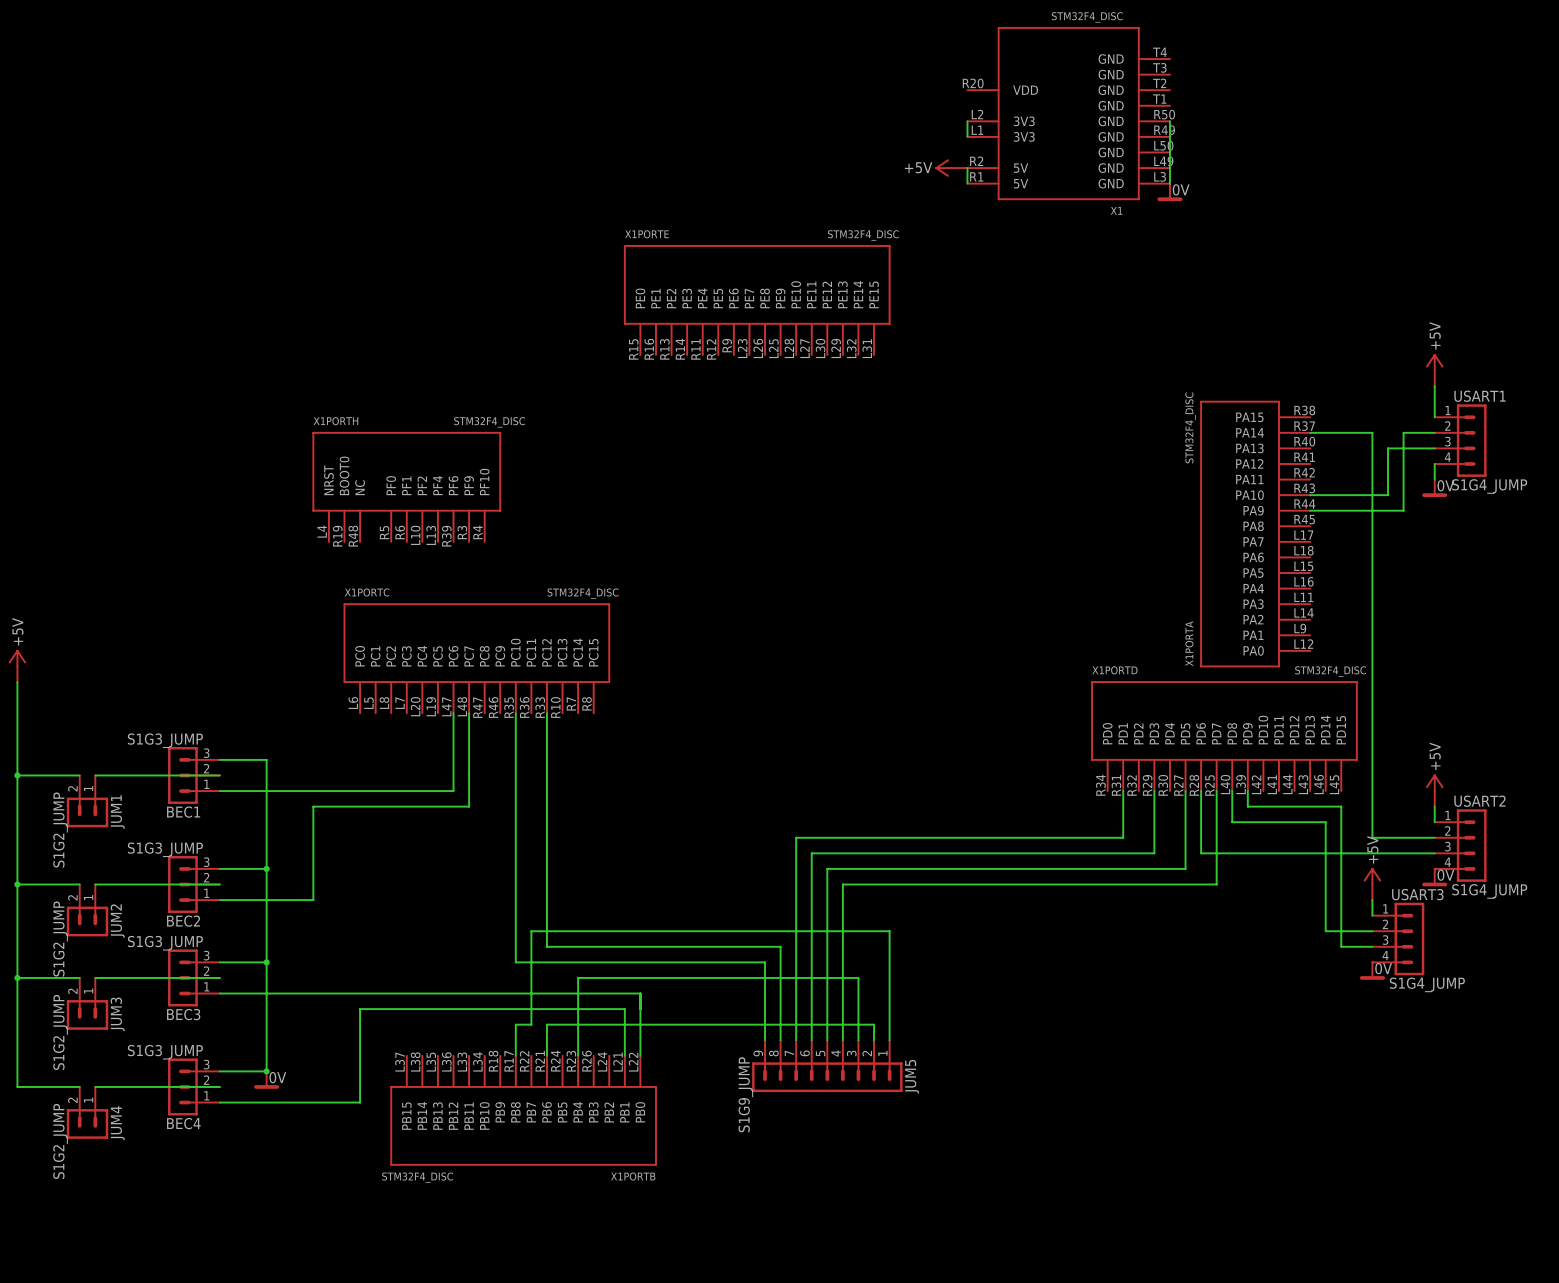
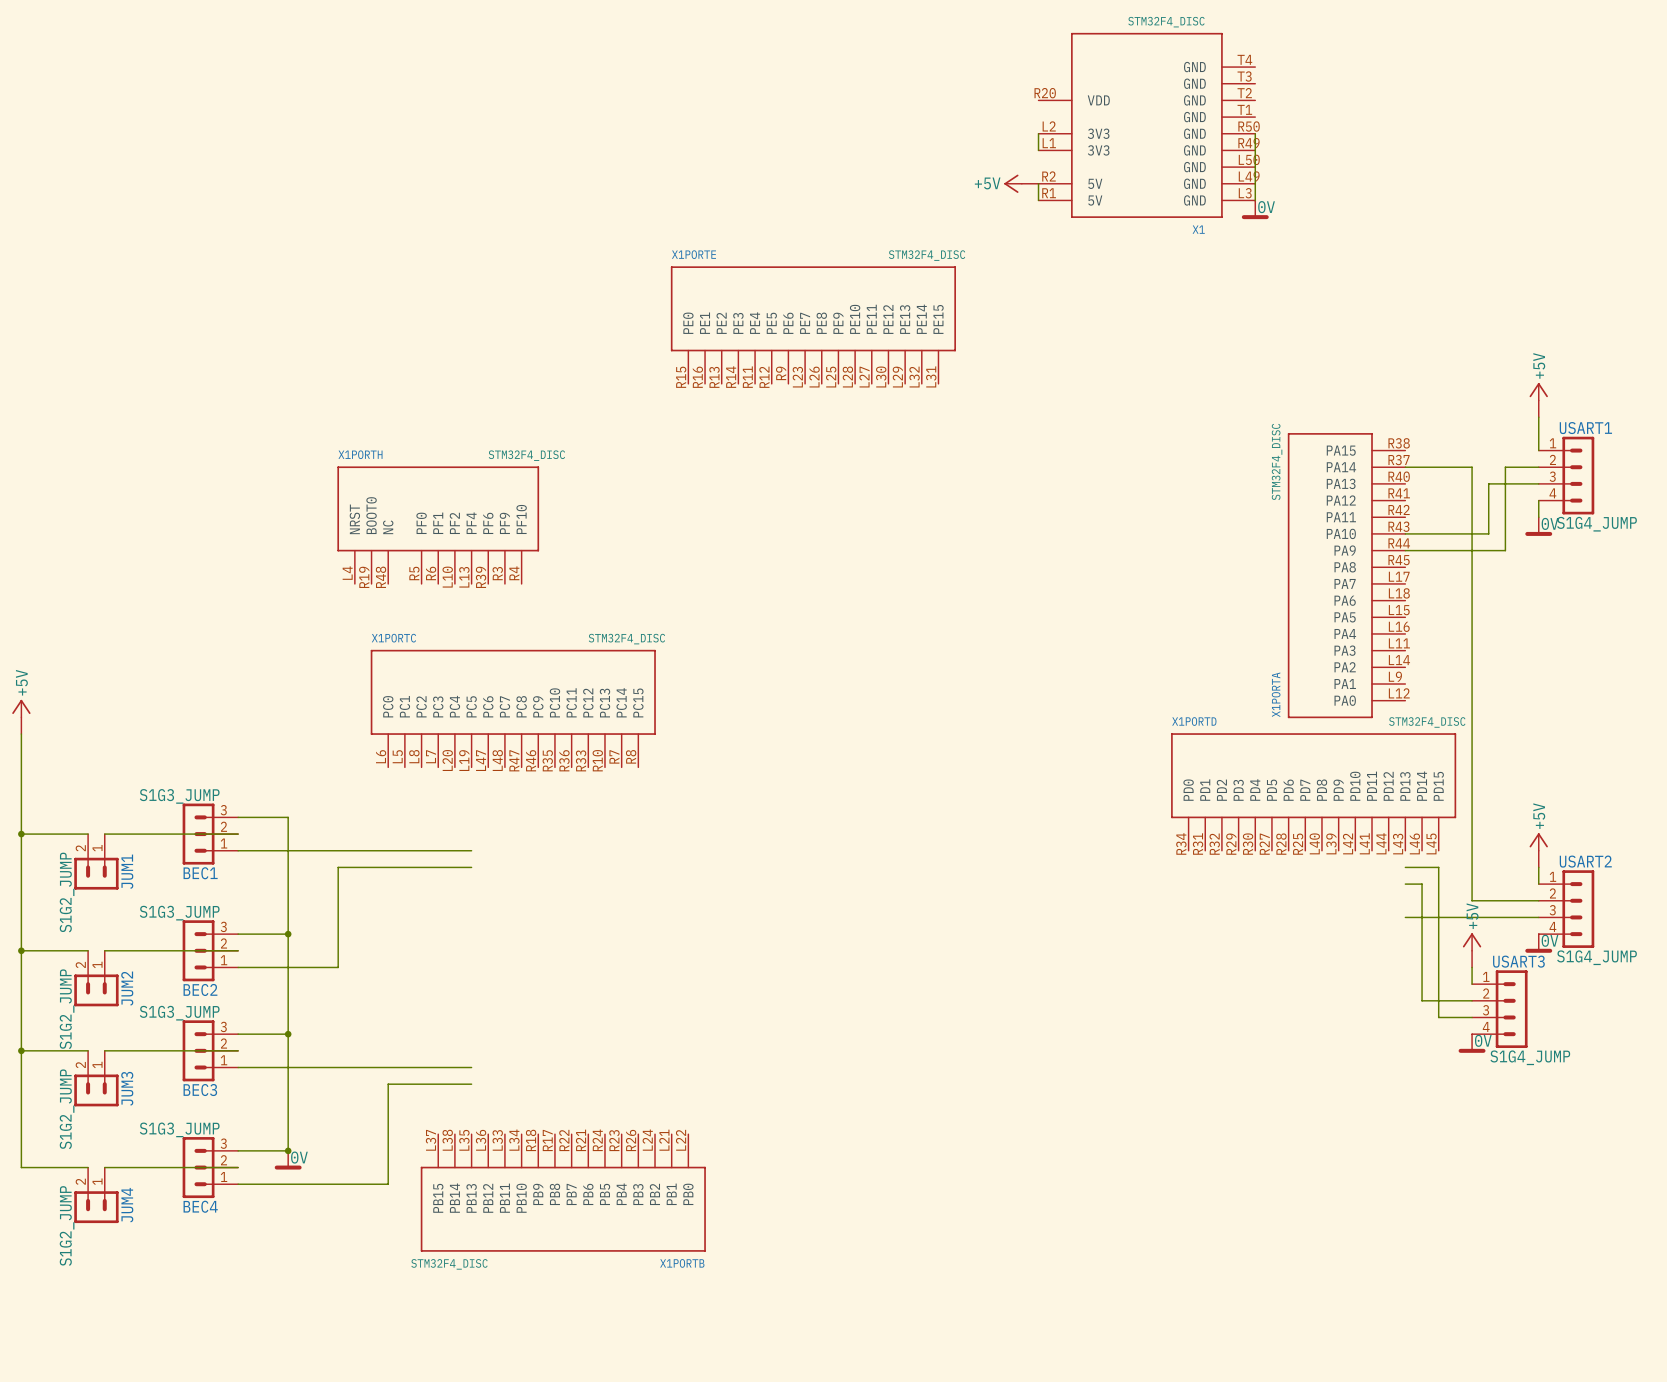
wire: (453, 713) (453, 791) (437, 791) -> none
wire: (469, 713) (469, 806) (437, 806) -> none
wire: (515, 713) (515, 962) (765, 962) (765, 1040) -> none
wire: (546, 713) (546, 946) (780, 946) (780, 1040) -> none
wire: (1123, 791) (1123, 837) (796, 837) (796, 1040) -> none
wire: (1154, 791) (1154, 853) (811, 853) (811, 1040) -> none
wire: (1185, 791) (1185, 868) (827, 868) (827, 1040) -> none
wire: (1201, 791) (1201, 853) (1310, 853) -> none
wire: (1216, 791) (1216, 884) (842, 884) (842, 1040) -> none
wire: (1232, 791) (1232, 822) (1310, 822) -> none
wire: (1247, 791) (1247, 806) (1310, 806) -> none
wire: (437, 993) (640, 993) (640, 1055) -> none
wire: (437, 1009) (624, 1009) (624, 1055) -> none
wire: (858, 1040) (858, 977) (578, 977) (578, 1055) -> none
wire: (874, 1040) (874, 1024) (546, 1024) (546, 1055) -> none
wire: (889, 1040) (889, 931) (531, 931) (531, 1024) (515, 1024) (515, 1055) -> none
JUM5: S1G9_JUMP (827, 1066) -> none

